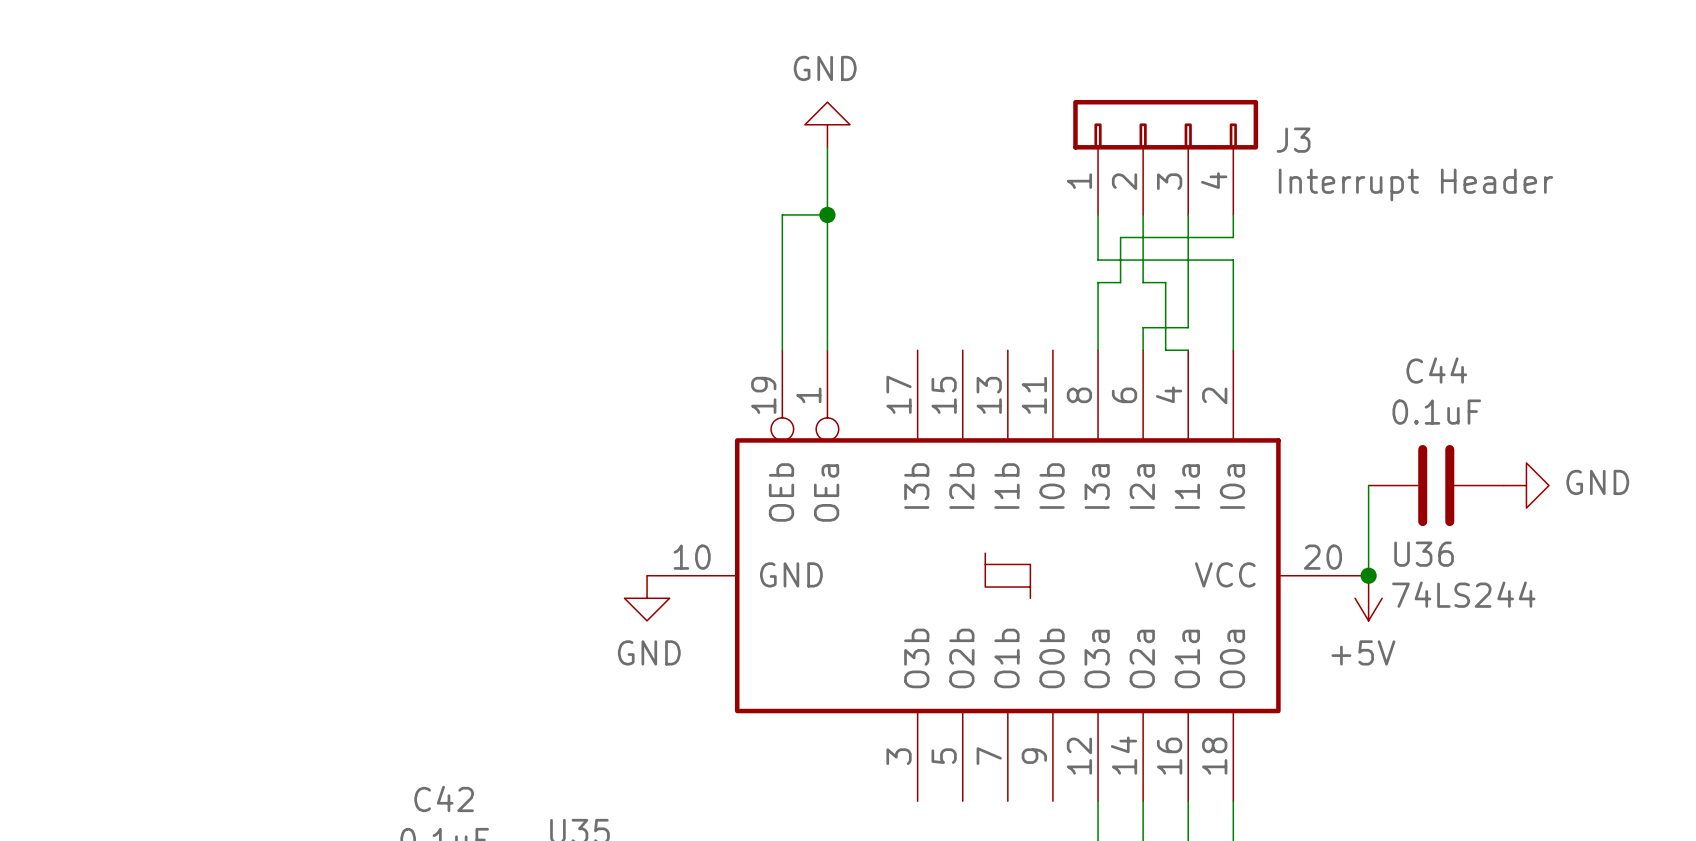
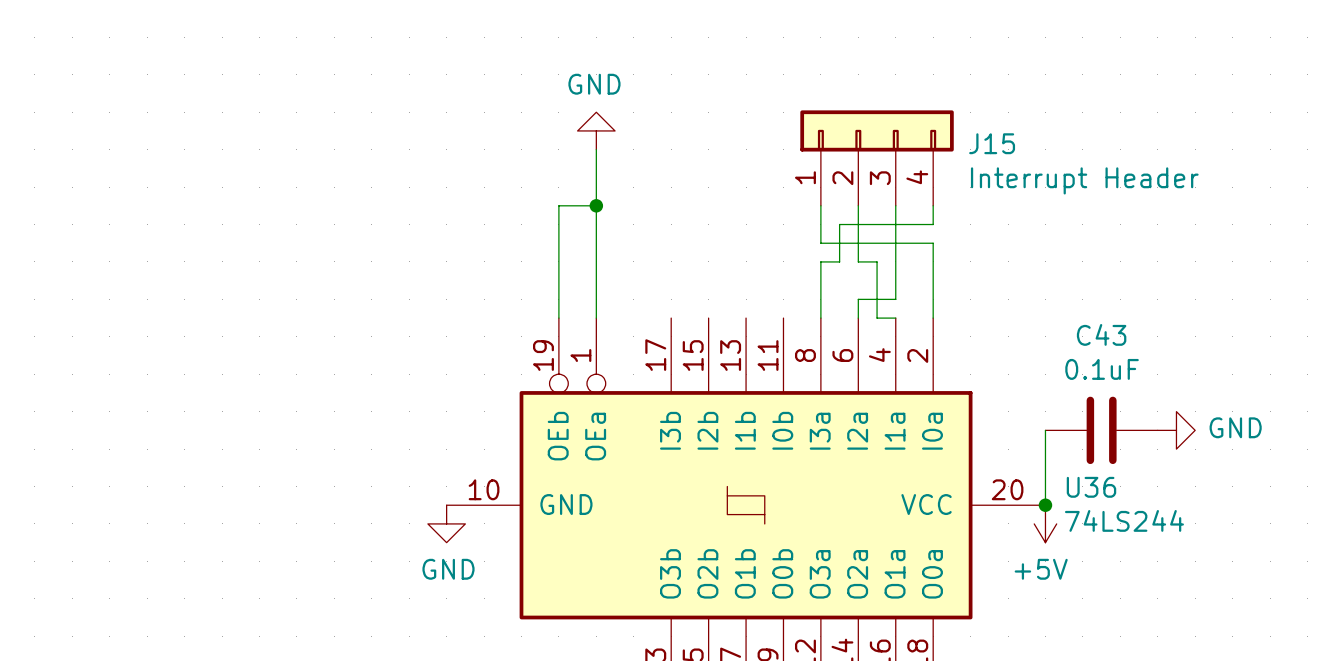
J3 name: J3 (1293, 140) -> J15 (992, 143)
C44 name: C44 (1436, 370) -> C43 (1101, 334)

